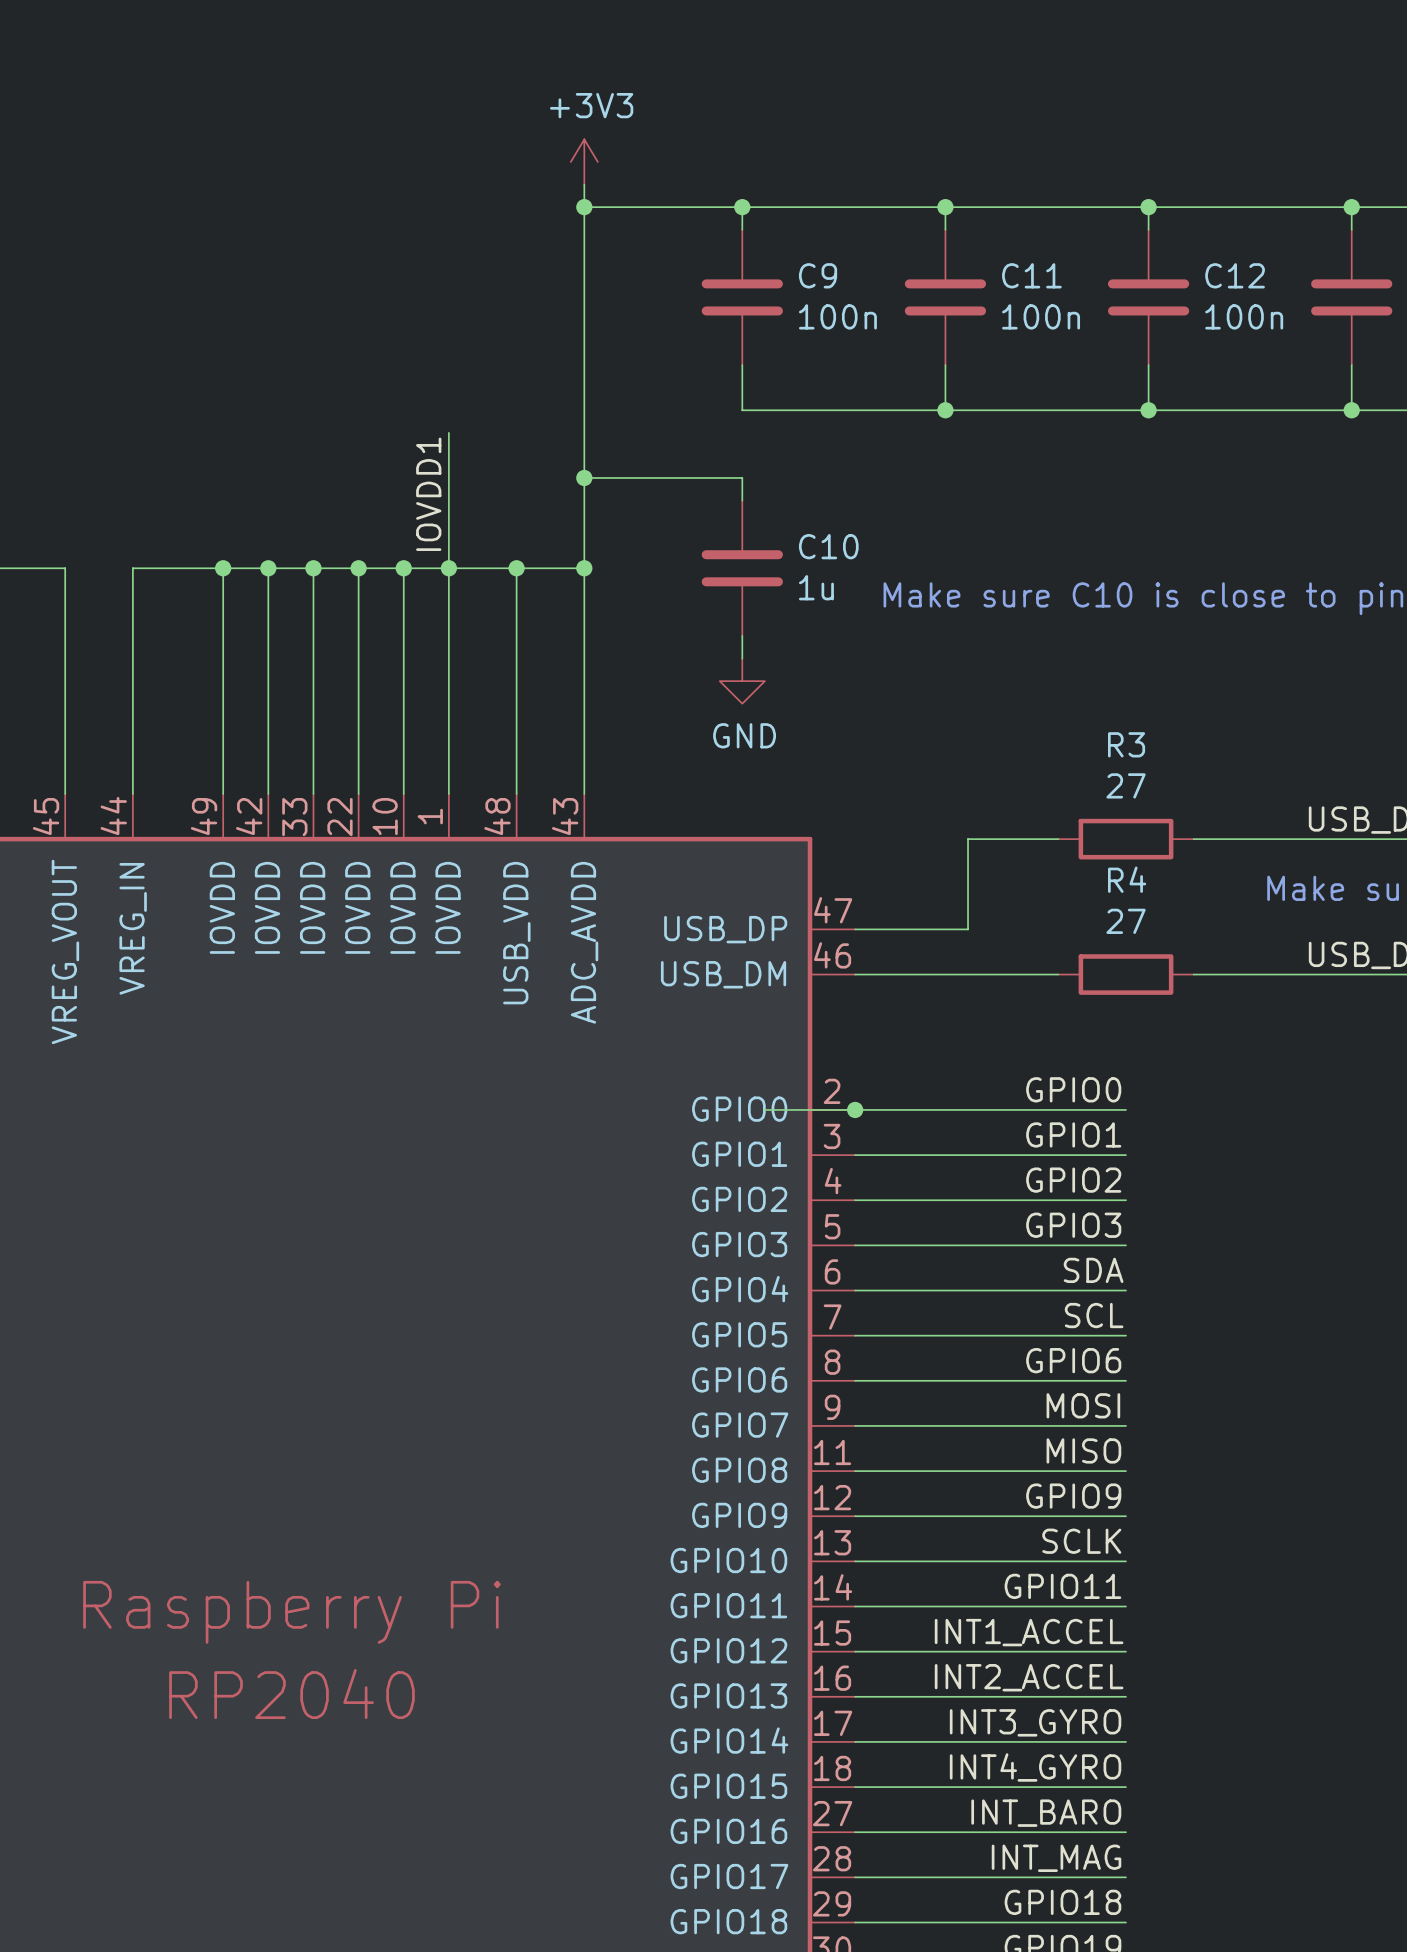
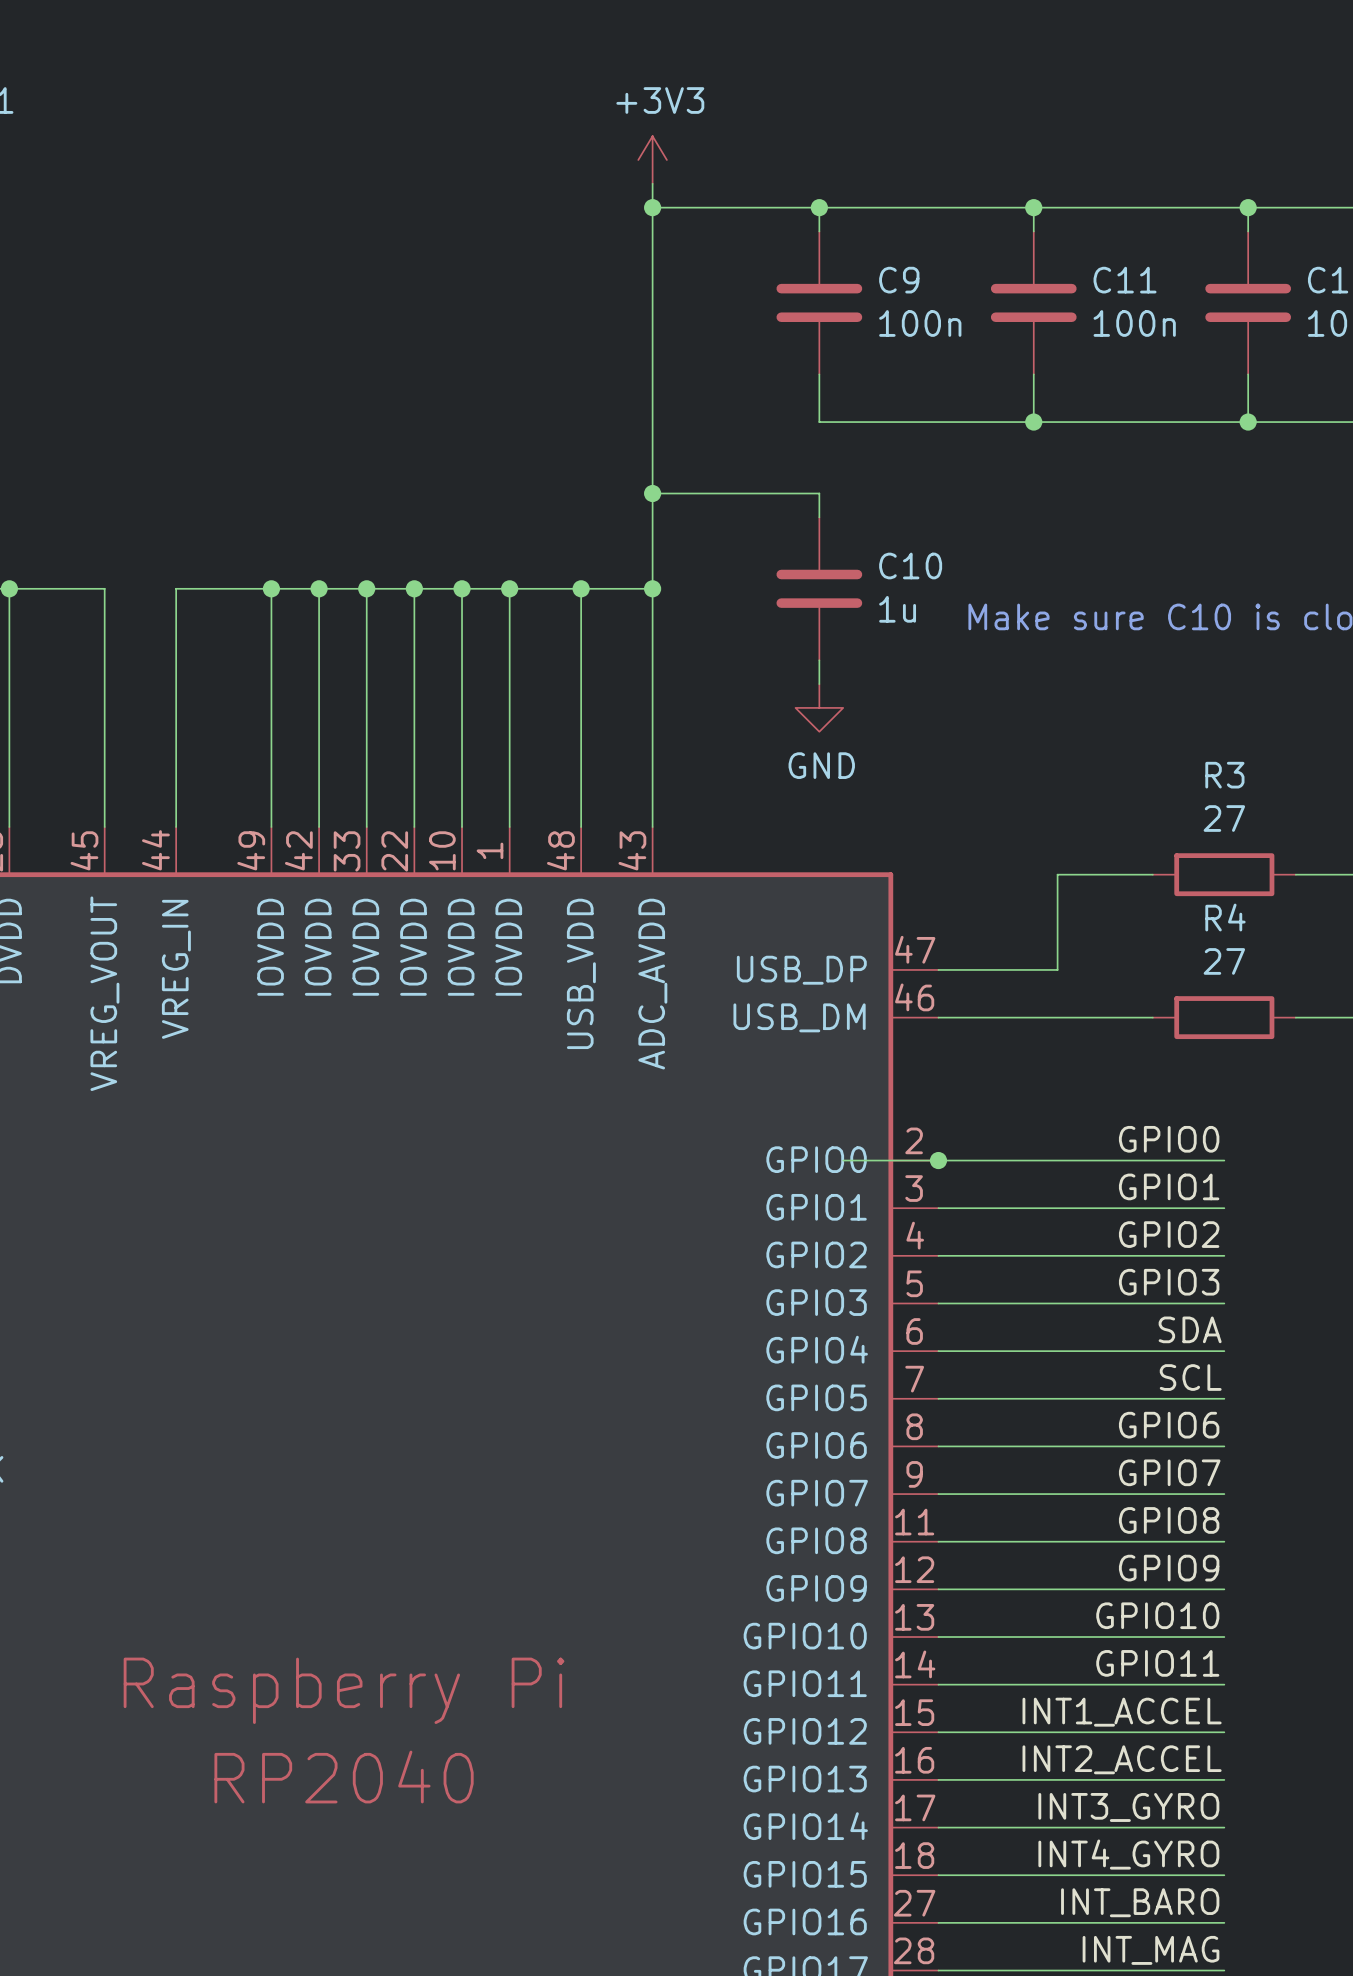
wire: (448, 432) (448, 568) -> none
label: IOVDD1 (428, 494) -> none
label: MOSI (1083, 1405) -> GPIO7 (1169, 1472)
label: MISO (1083, 1450) -> GPIO8 (1169, 1520)
label: SCLK (1081, 1541) -> GPIO10 (1157, 1615)

